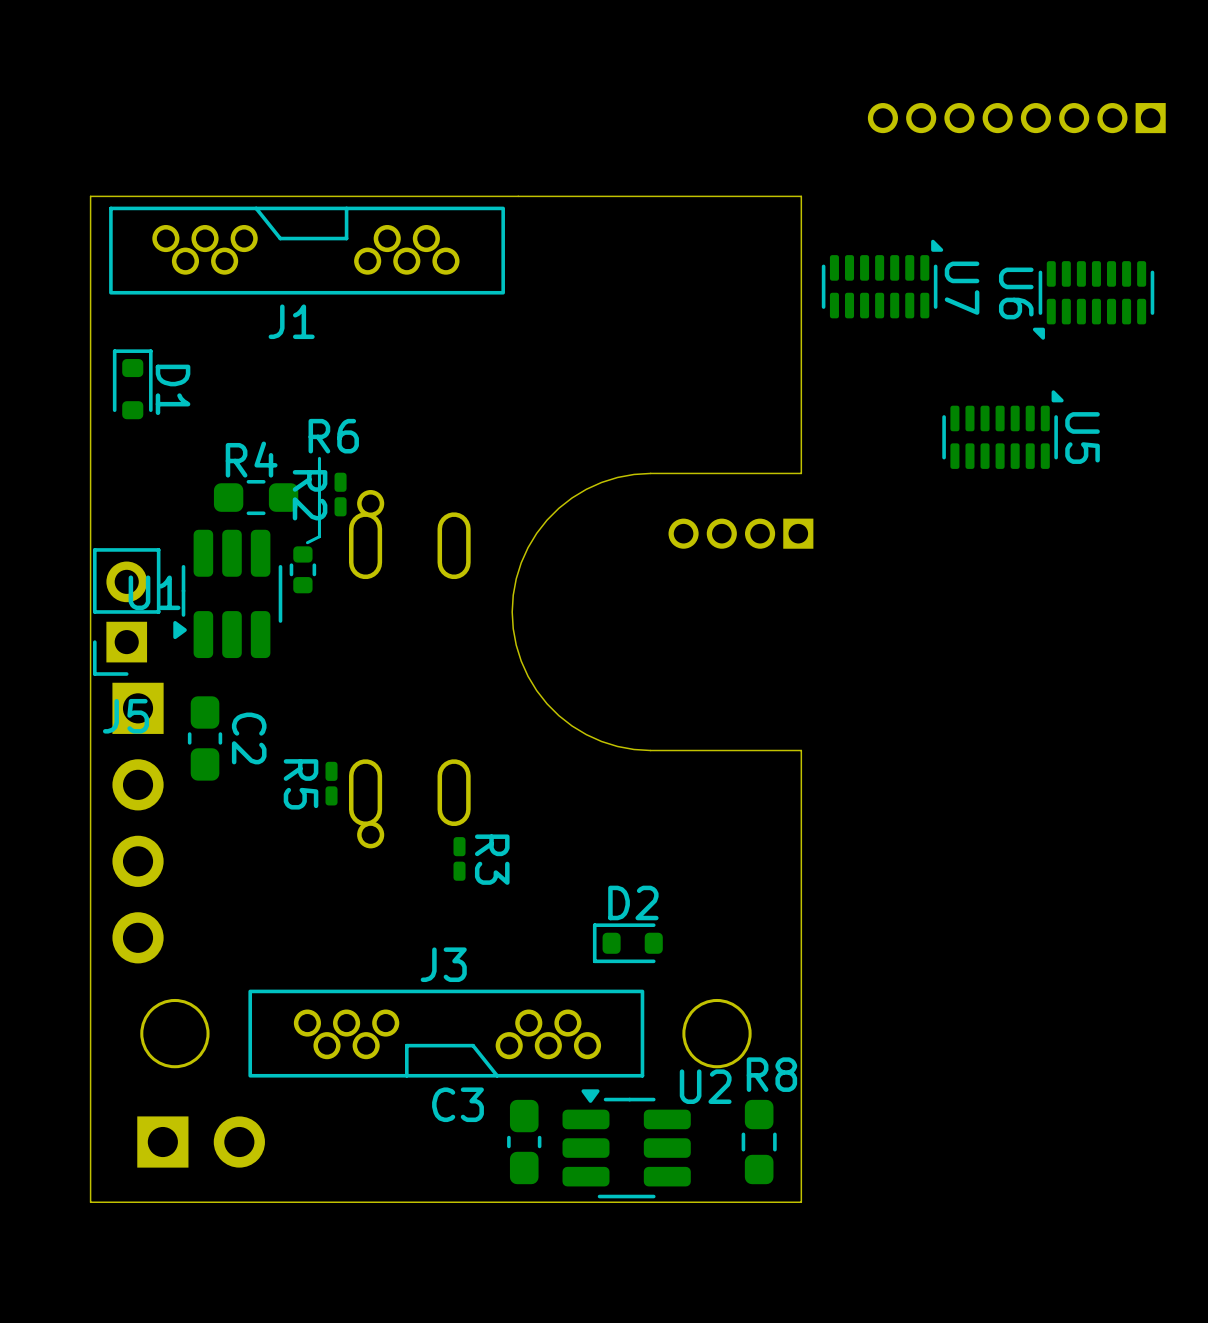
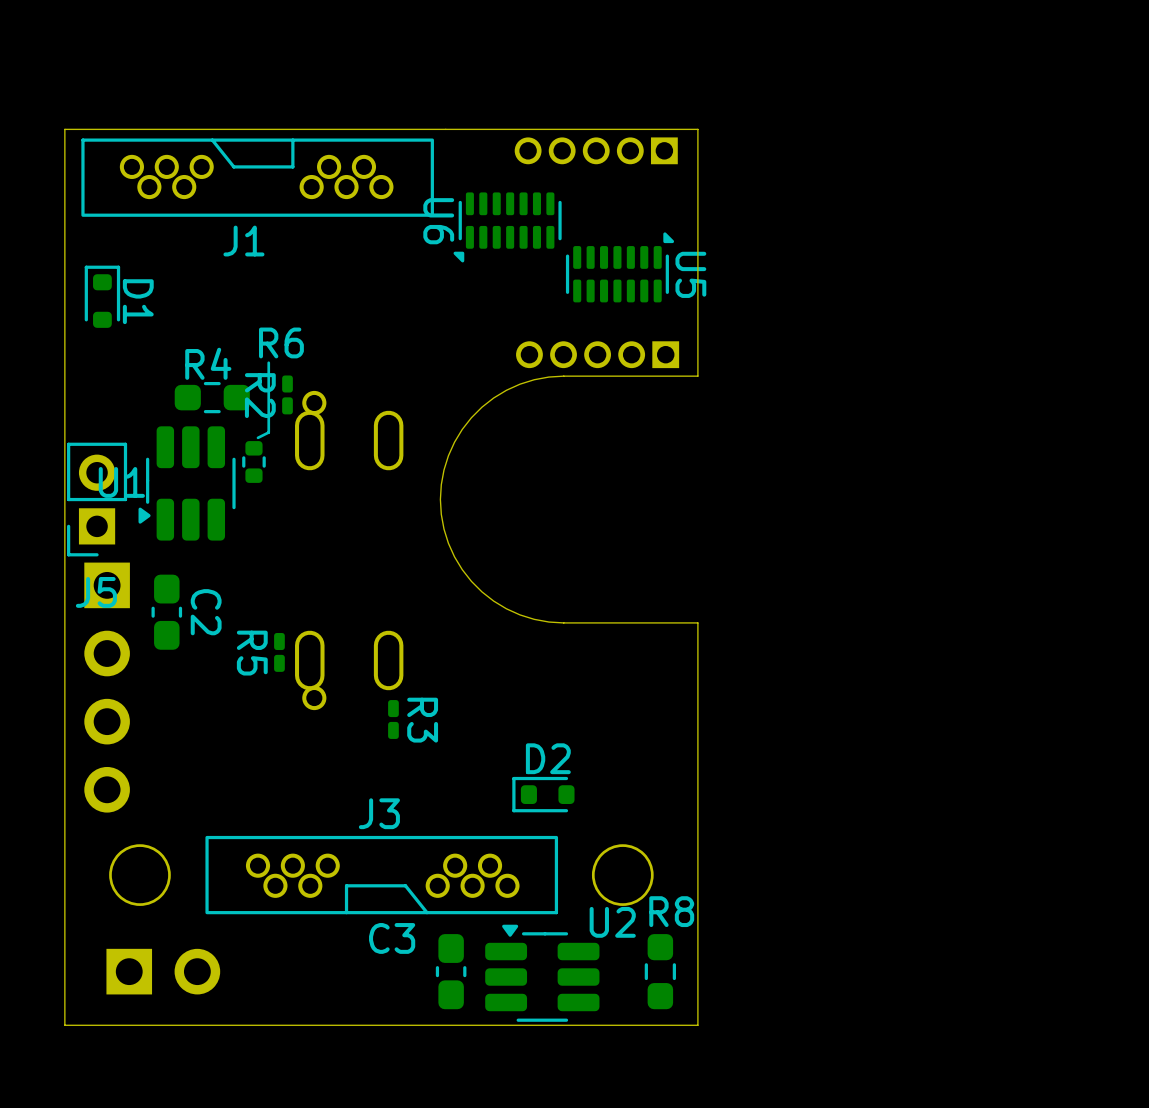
part: (1016, 118) -> none
part: none -> (596, 150)
U7: (882, 279) -> none
U6 position: (1093, 300) -> (507, 227)
U5 position: (1002, 429) -> (619, 267)
part: none -> (597, 354)
part: (740, 533) -> none

